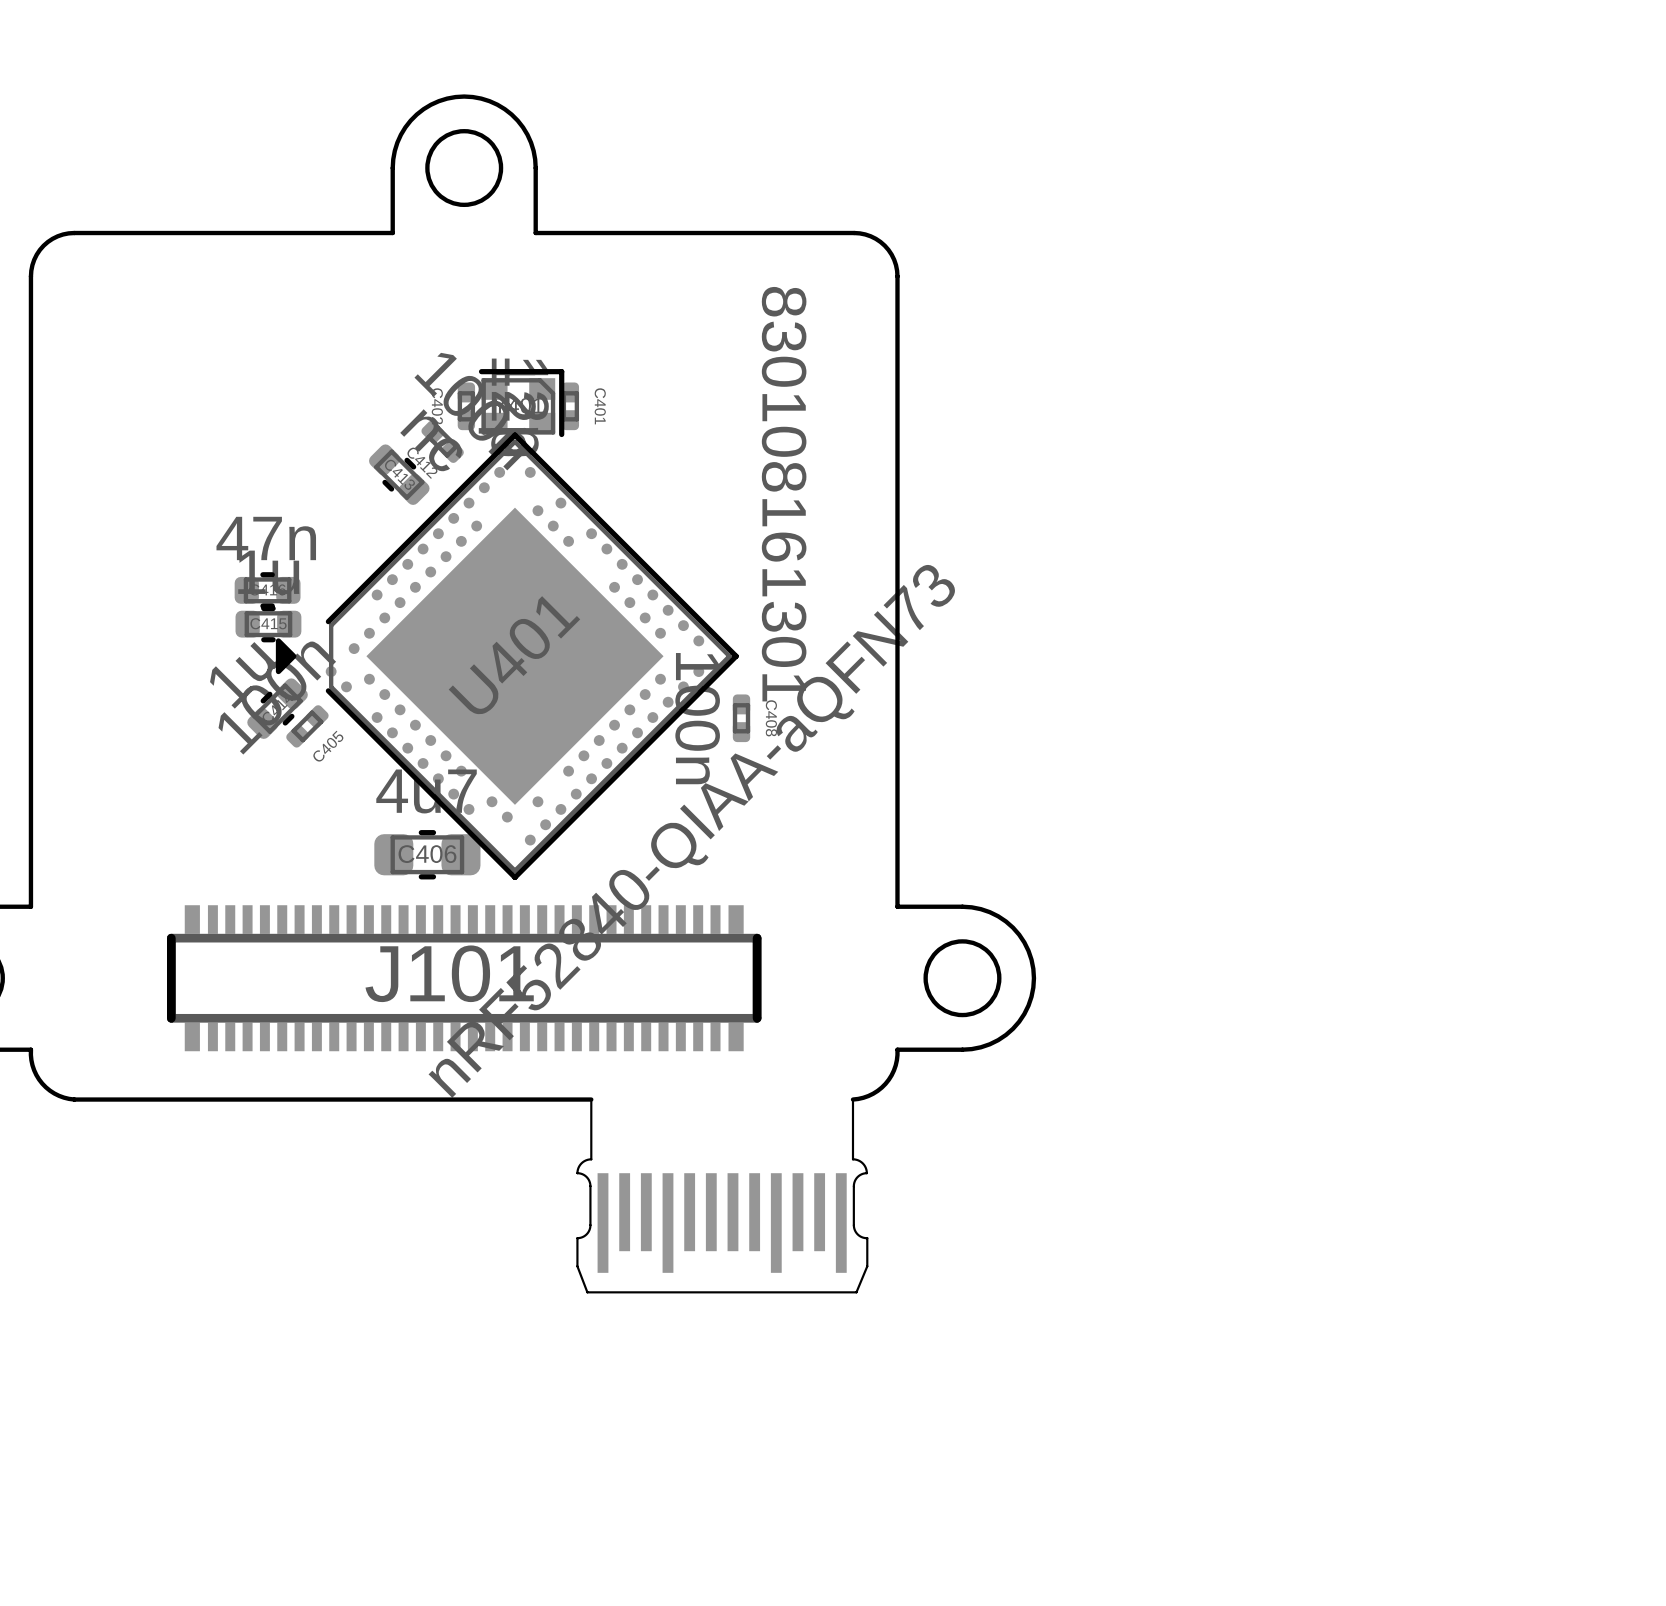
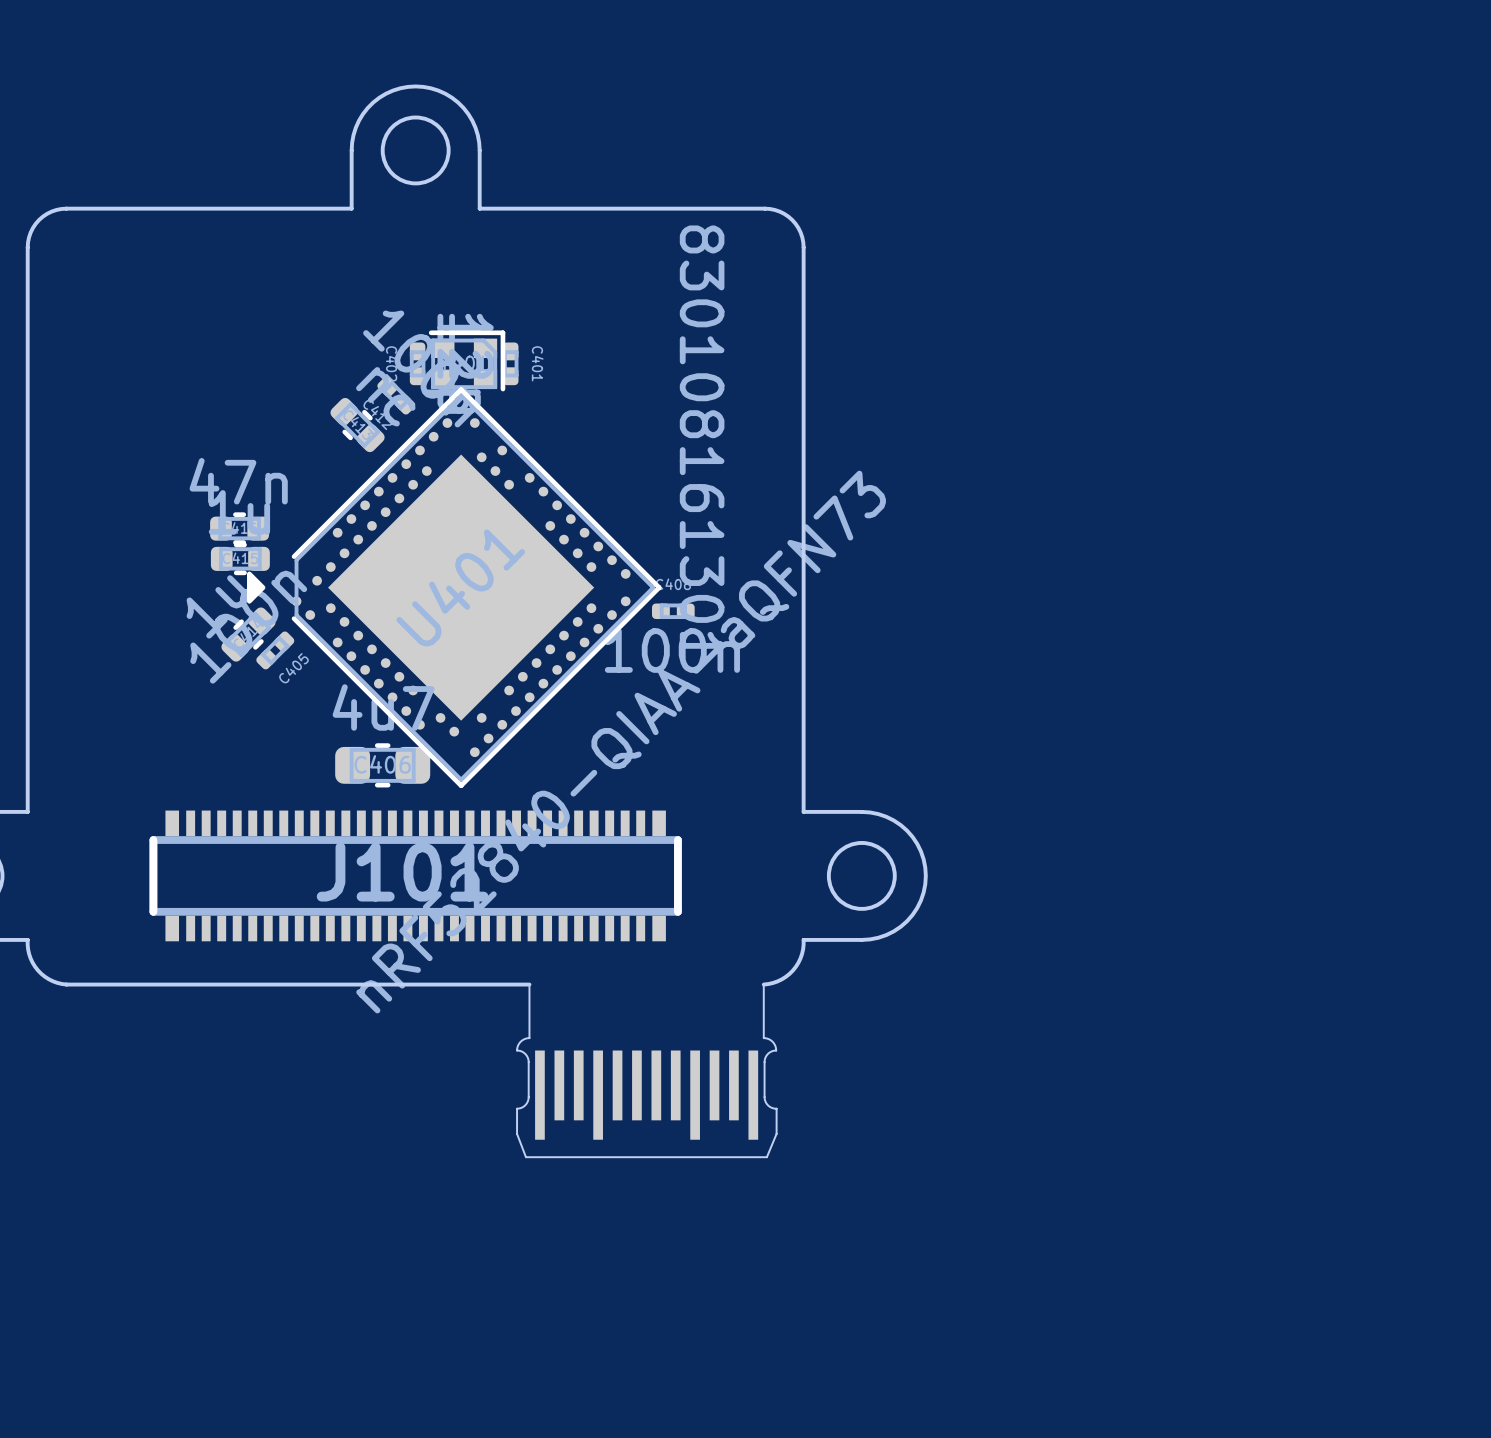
C408 rotation: 0° (741, 718) -> 90° clockwise (673, 611)
C408 position: (741, 718) -> (673, 611)

